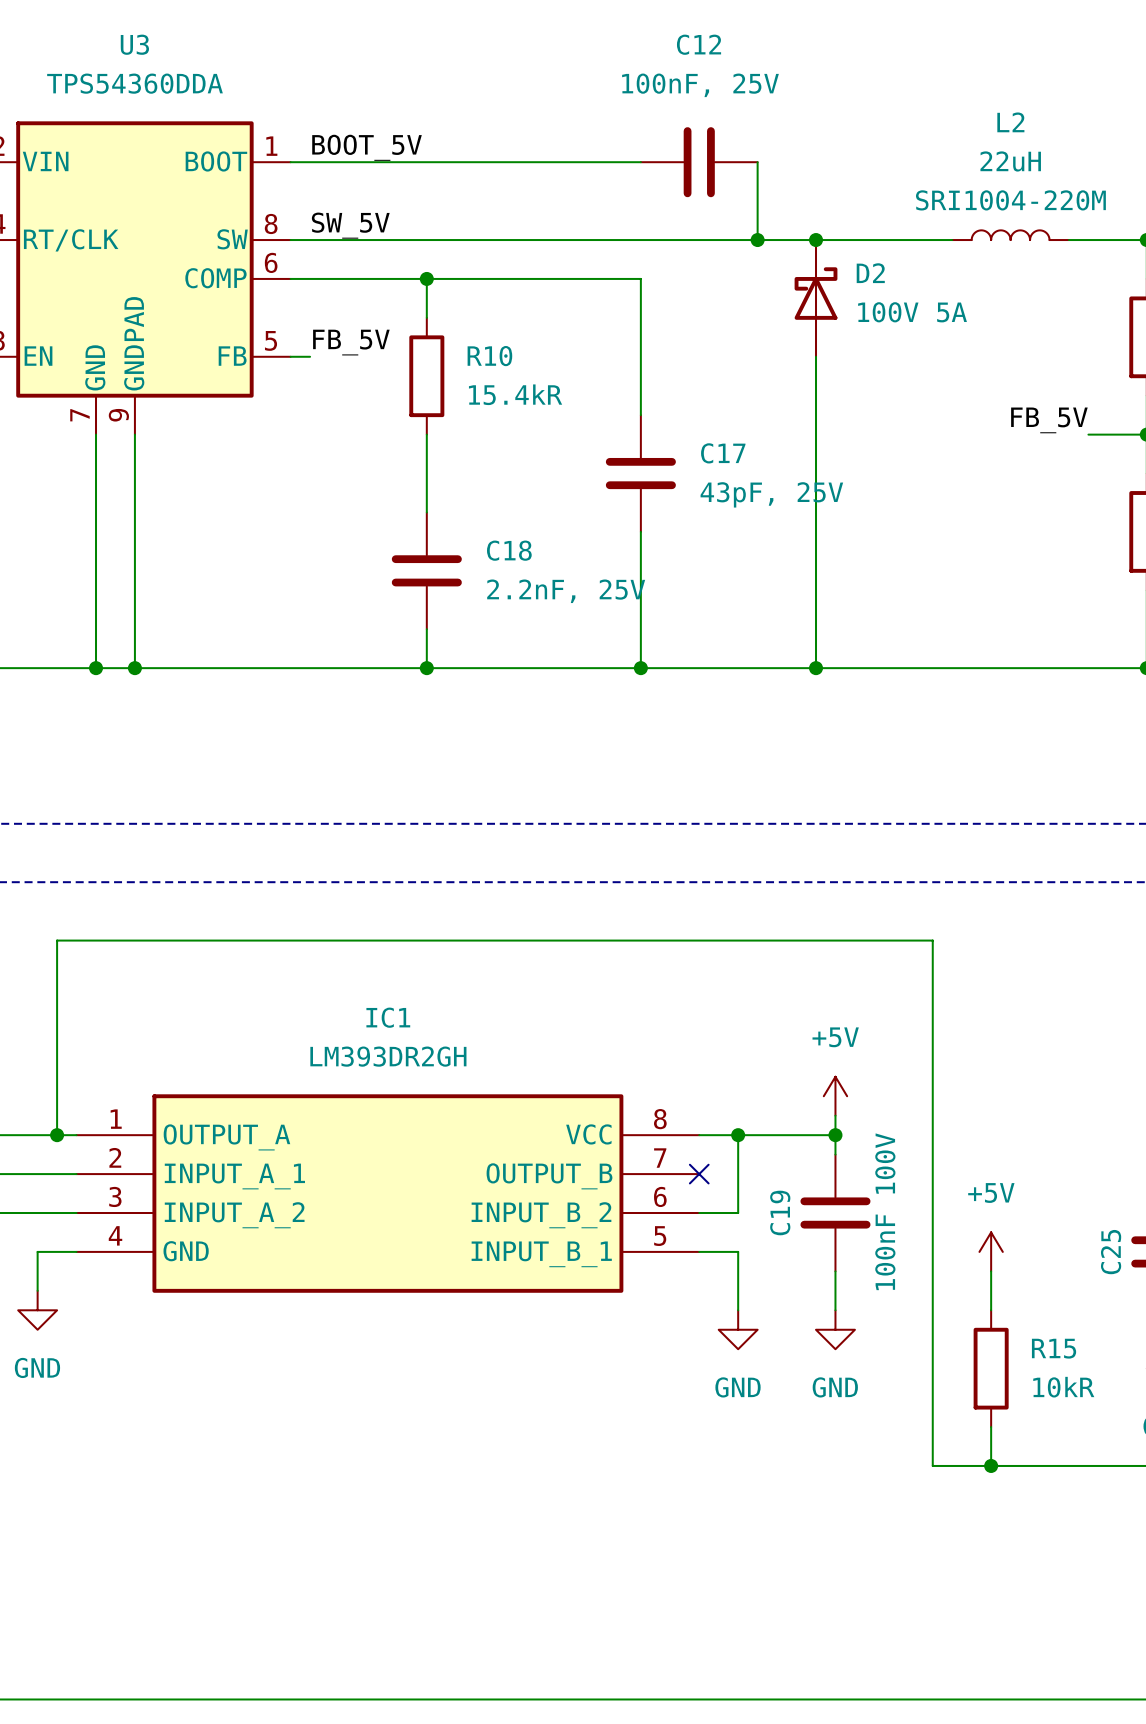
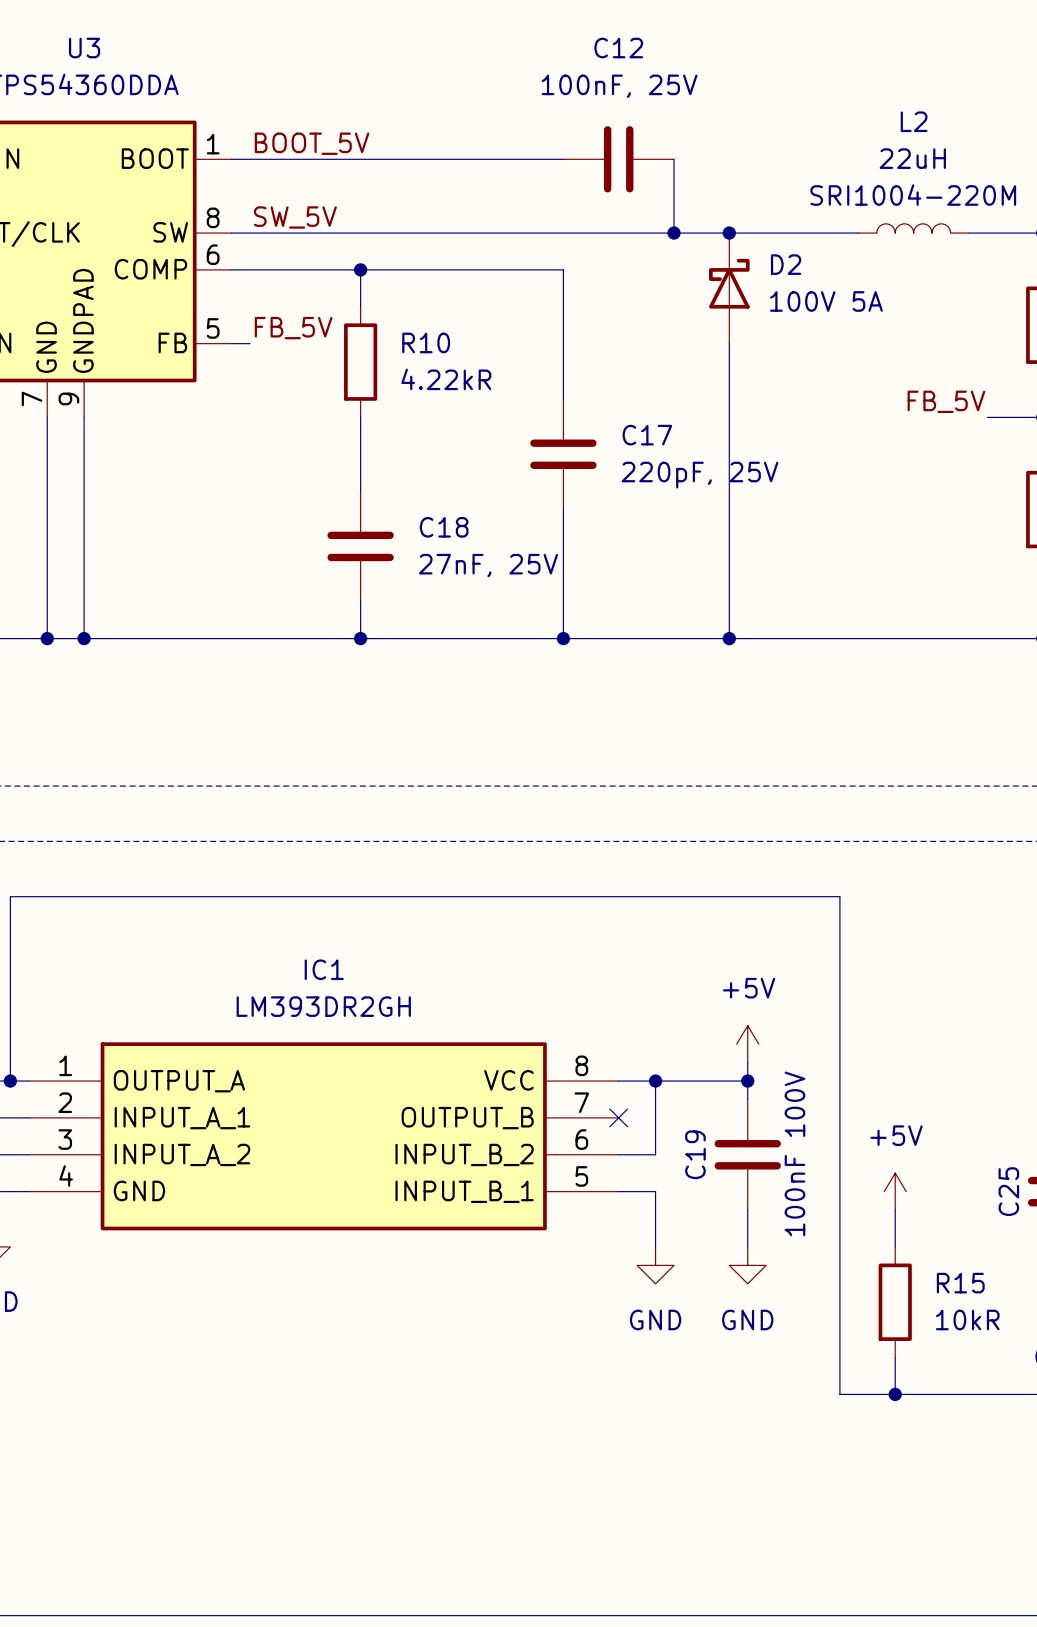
R10 value: 15.4kR (515, 394) -> 4.22kR (446, 379)
C17 value: 43pF, 25V (771, 494) -> 220pF, 25V (700, 475)
C18 value: 2.2nF, 25V (566, 591) -> 27nF, 25V (488, 565)

